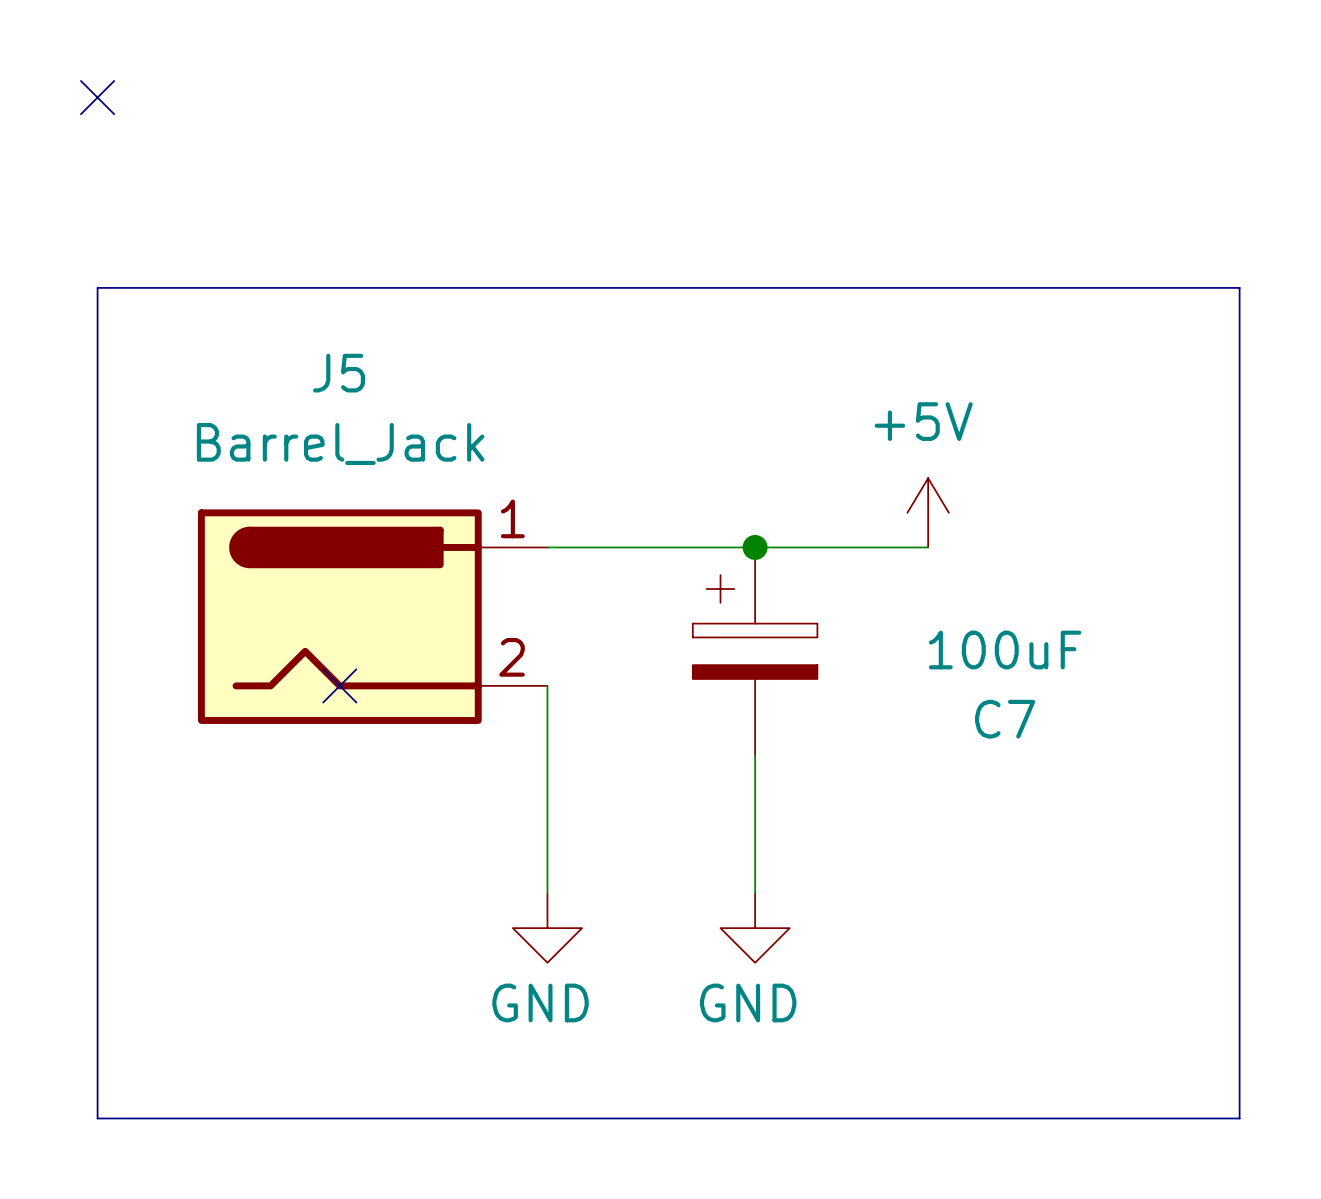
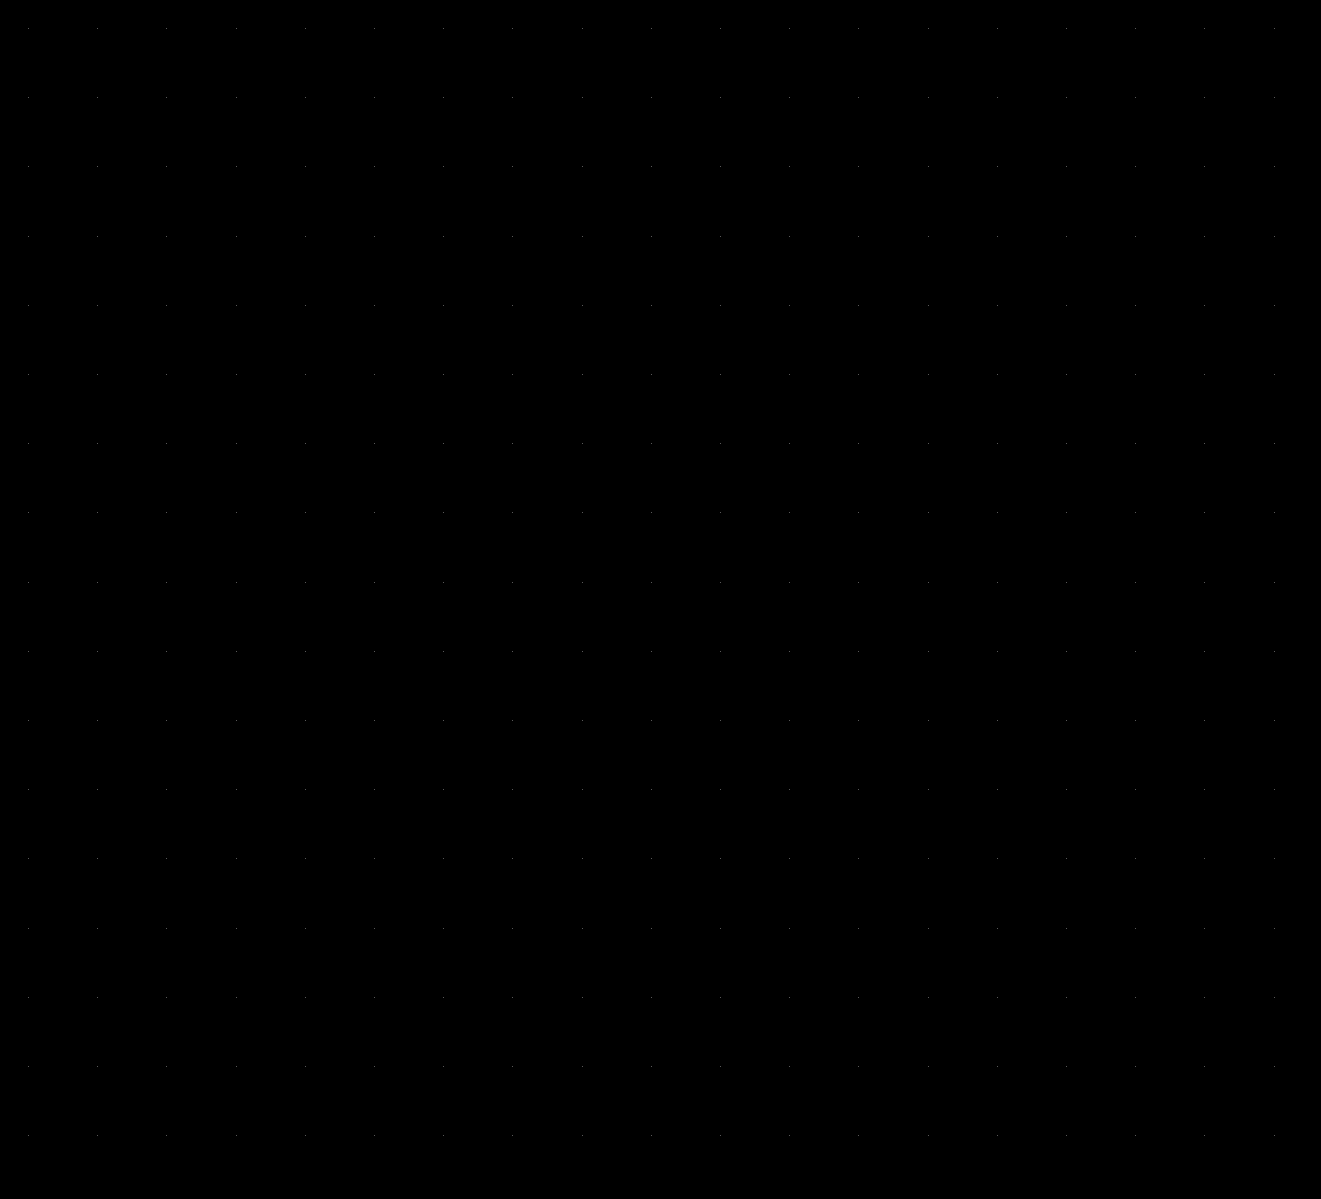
no-connect mark: (97, 97) -> none
line: (97, 287) (1239, 287) (1239, 1118) (97, 1118) (97, 287) -> none
power symbol: +5V (928, 512) -> none
wire: (547, 547) (928, 547) -> none
junction: (755, 547) -> none
J5: Barrel_Jack (372, 616) -> none
C7: 100uF (755, 651) -> none
no-connect mark: (339, 685) -> none
wire: (547, 685) (547, 893) -> none
wire: (755, 755) (755, 893) -> none
power symbol: GND (547, 928) -> none
power symbol: GND (755, 928) -> none

